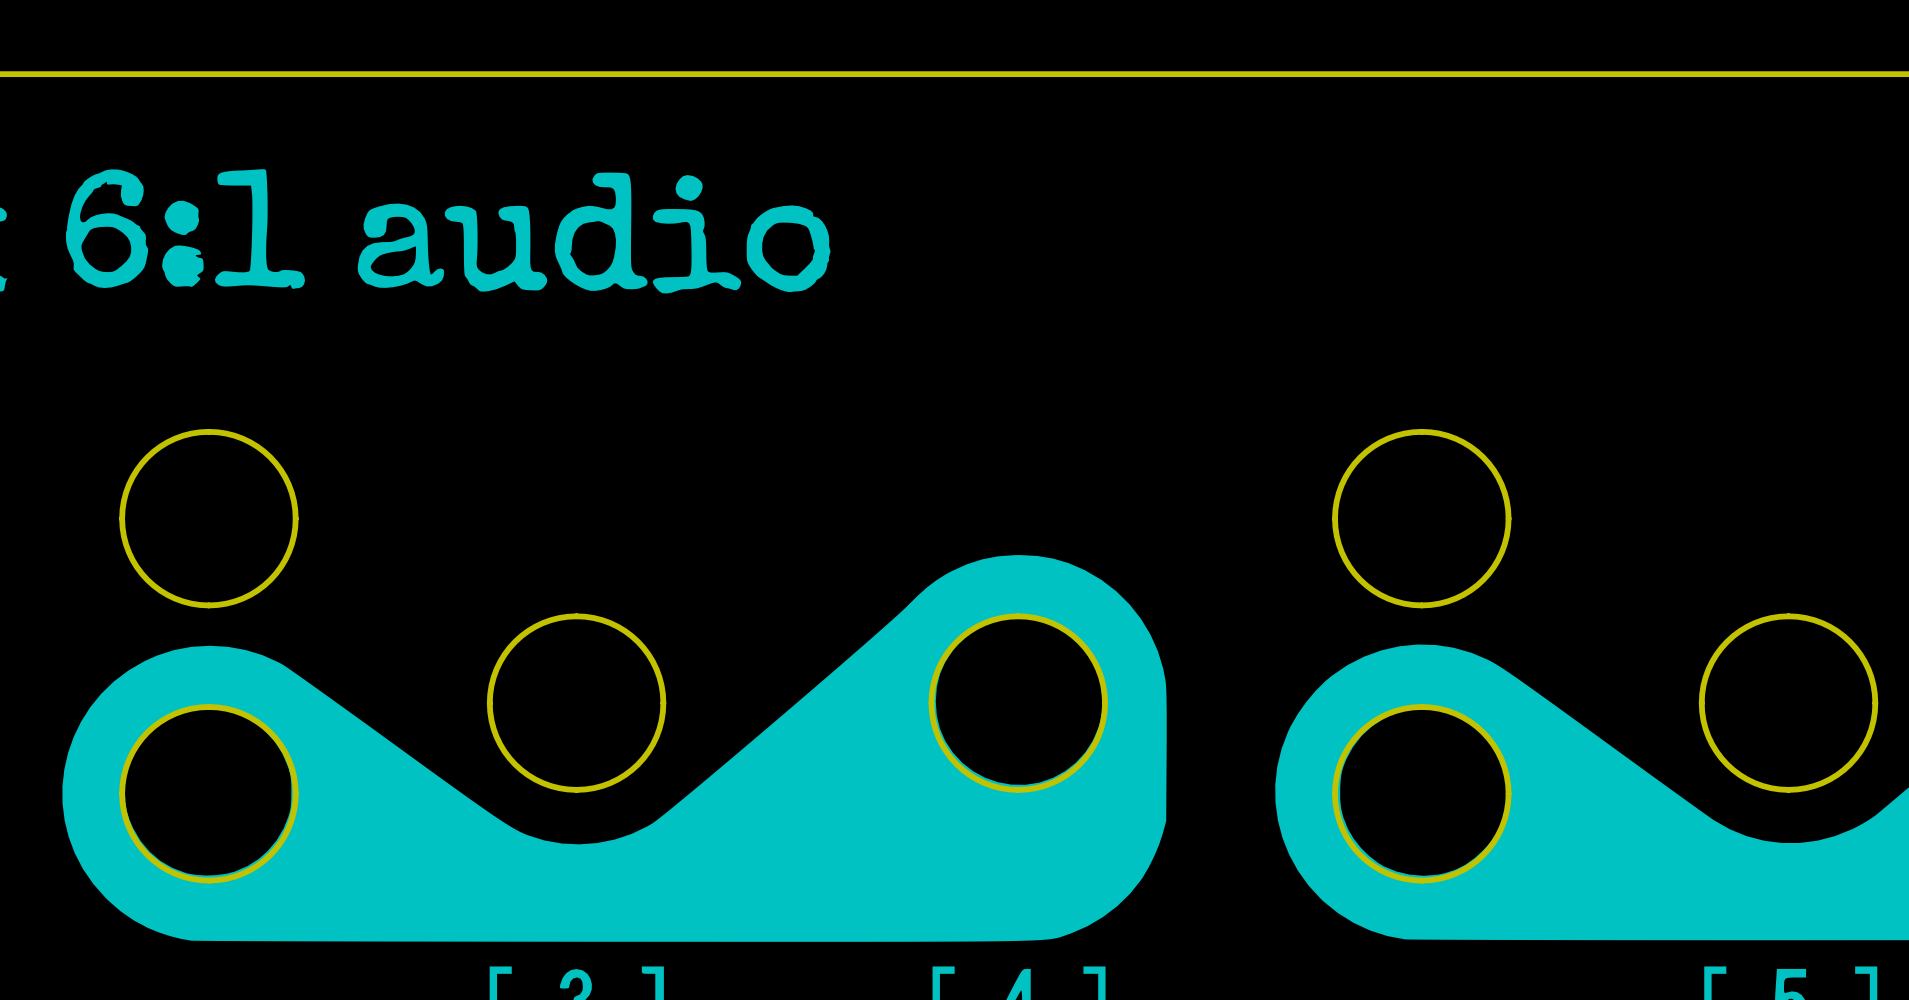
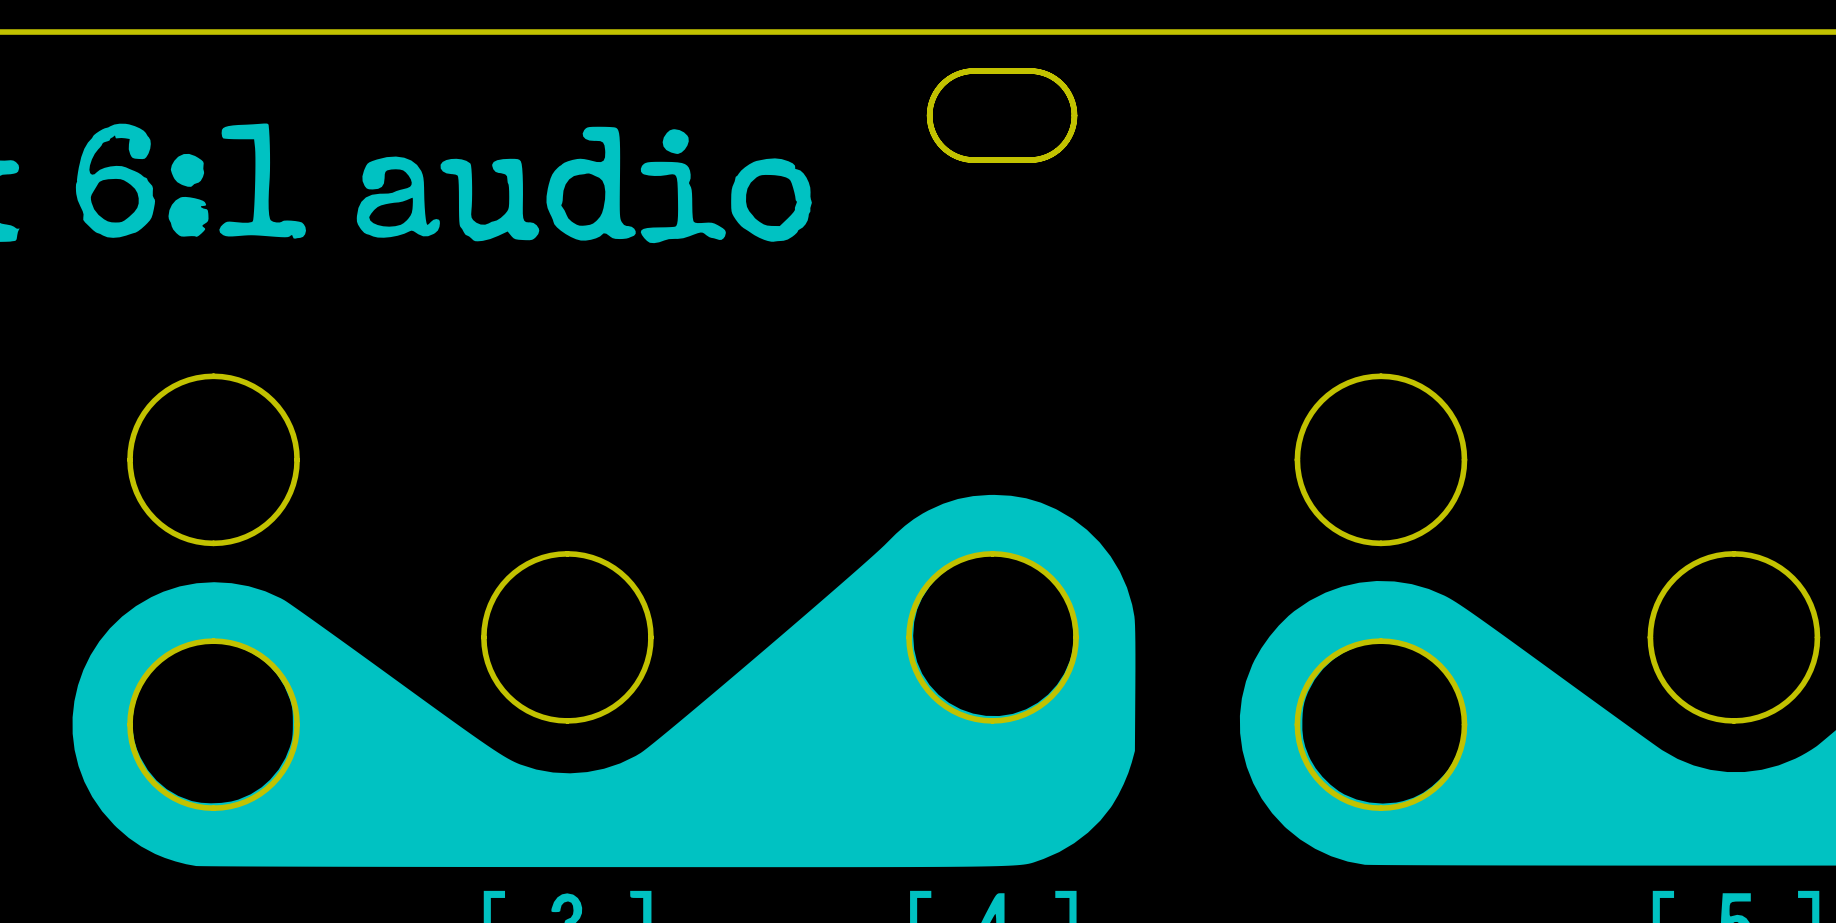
board edge: none -> (974, 71) (1029, 71)
board edge: none -> (974, 71) (1029, 71)
board edge: none -> (974, 71) (956, 74) (942, 84) (933, 98) (929, 115)
board edge: none -> (974, 71) (956, 74) (942, 84) (933, 98) (929, 115)
board edge: none -> (1029, 71) (1047, 74) (1061, 84) (1070, 98) (1074, 115)
board edge: none -> (1029, 71) (1047, 74) (1061, 84) (1070, 98) (1074, 115)
board edge: none -> (929, 115) (933, 132) (942, 147) (956, 156) (974, 160)
board edge: none -> (929, 115) (933, 132) (942, 147) (956, 156) (974, 160)
board edge: none -> (1074, 115) (1070, 132) (1061, 147) (1047, 156) (1029, 160)
board edge: none -> (1074, 115) (1070, 132) (1061, 147) (1047, 156) (1029, 160)
board edge: none -> (974, 160) (1029, 160)
board edge: none -> (974, 160) (1029, 160)

